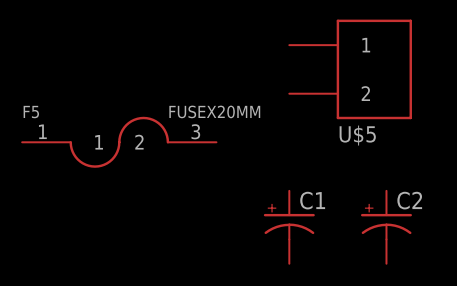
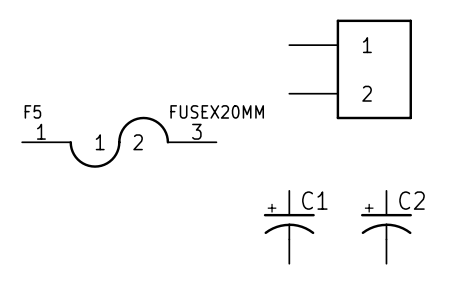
U$5 name: U$5 (357, 135) -> none

